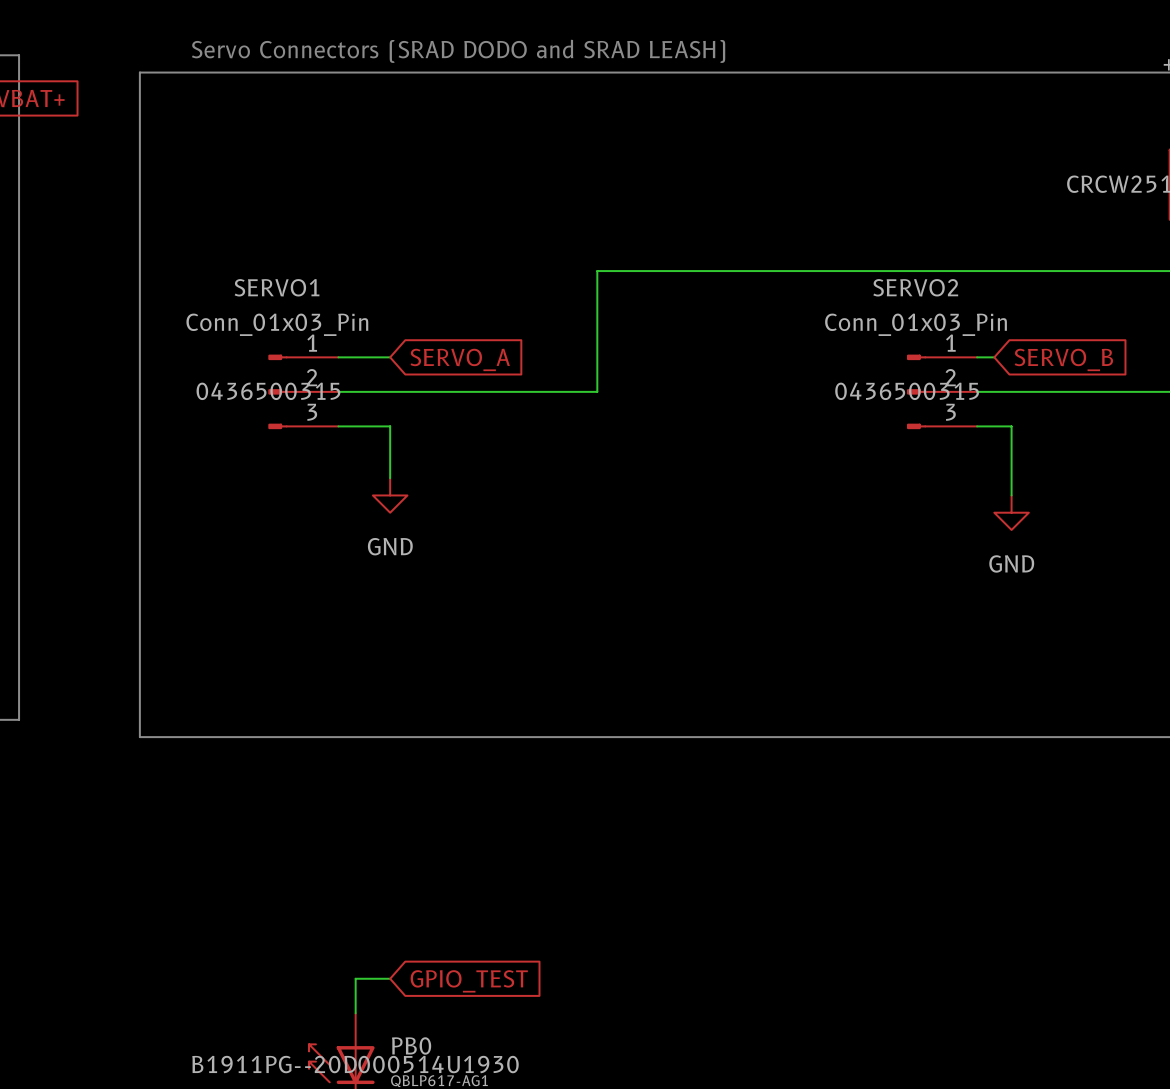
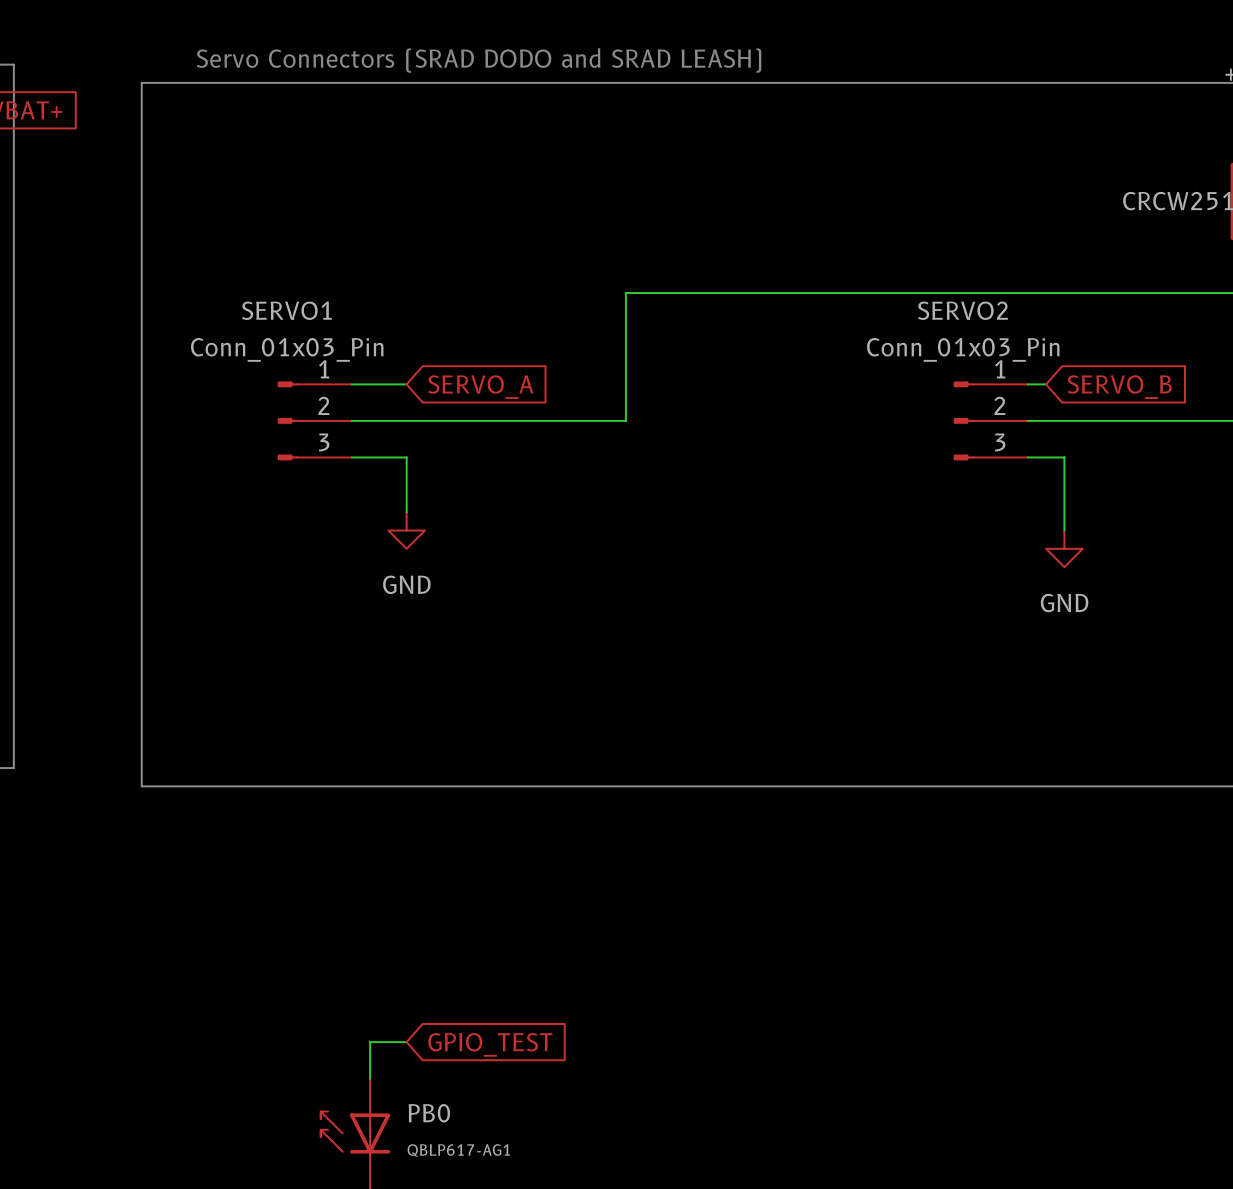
SERVO1 text: 0436500315 (268, 391) -> none
SERVO2 text: 0436500315 (907, 391) -> none
PB0 text: B1911PG--20D000514U1930 (355, 1064) -> none

